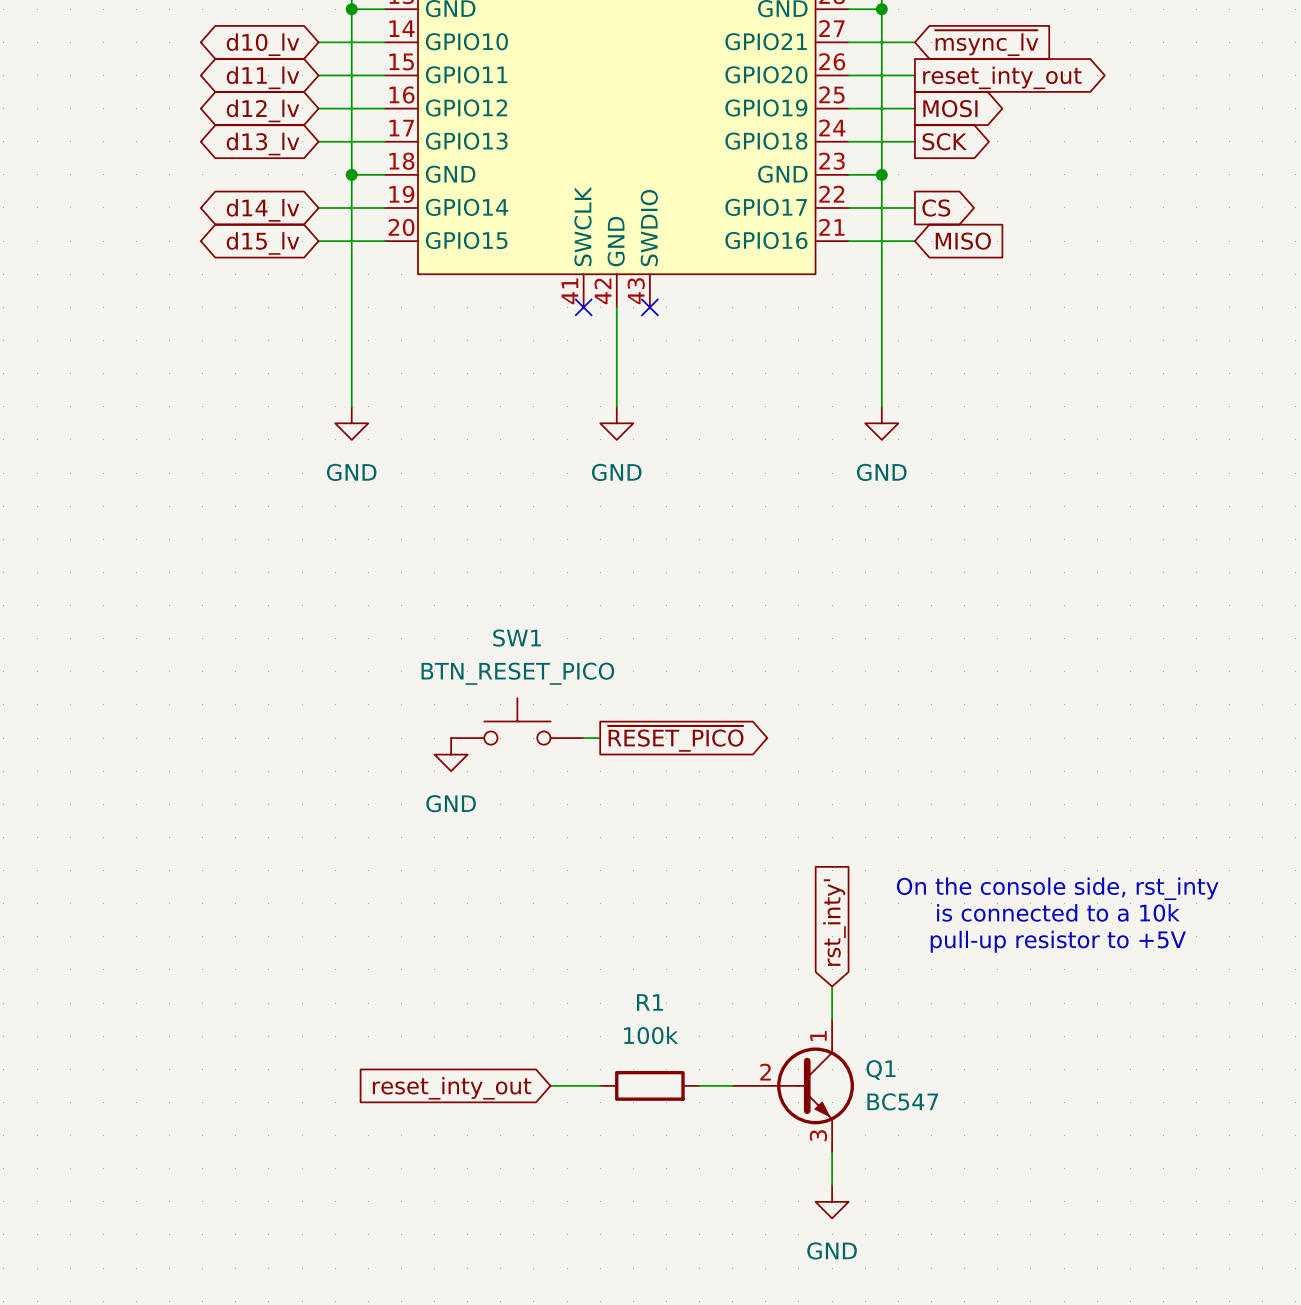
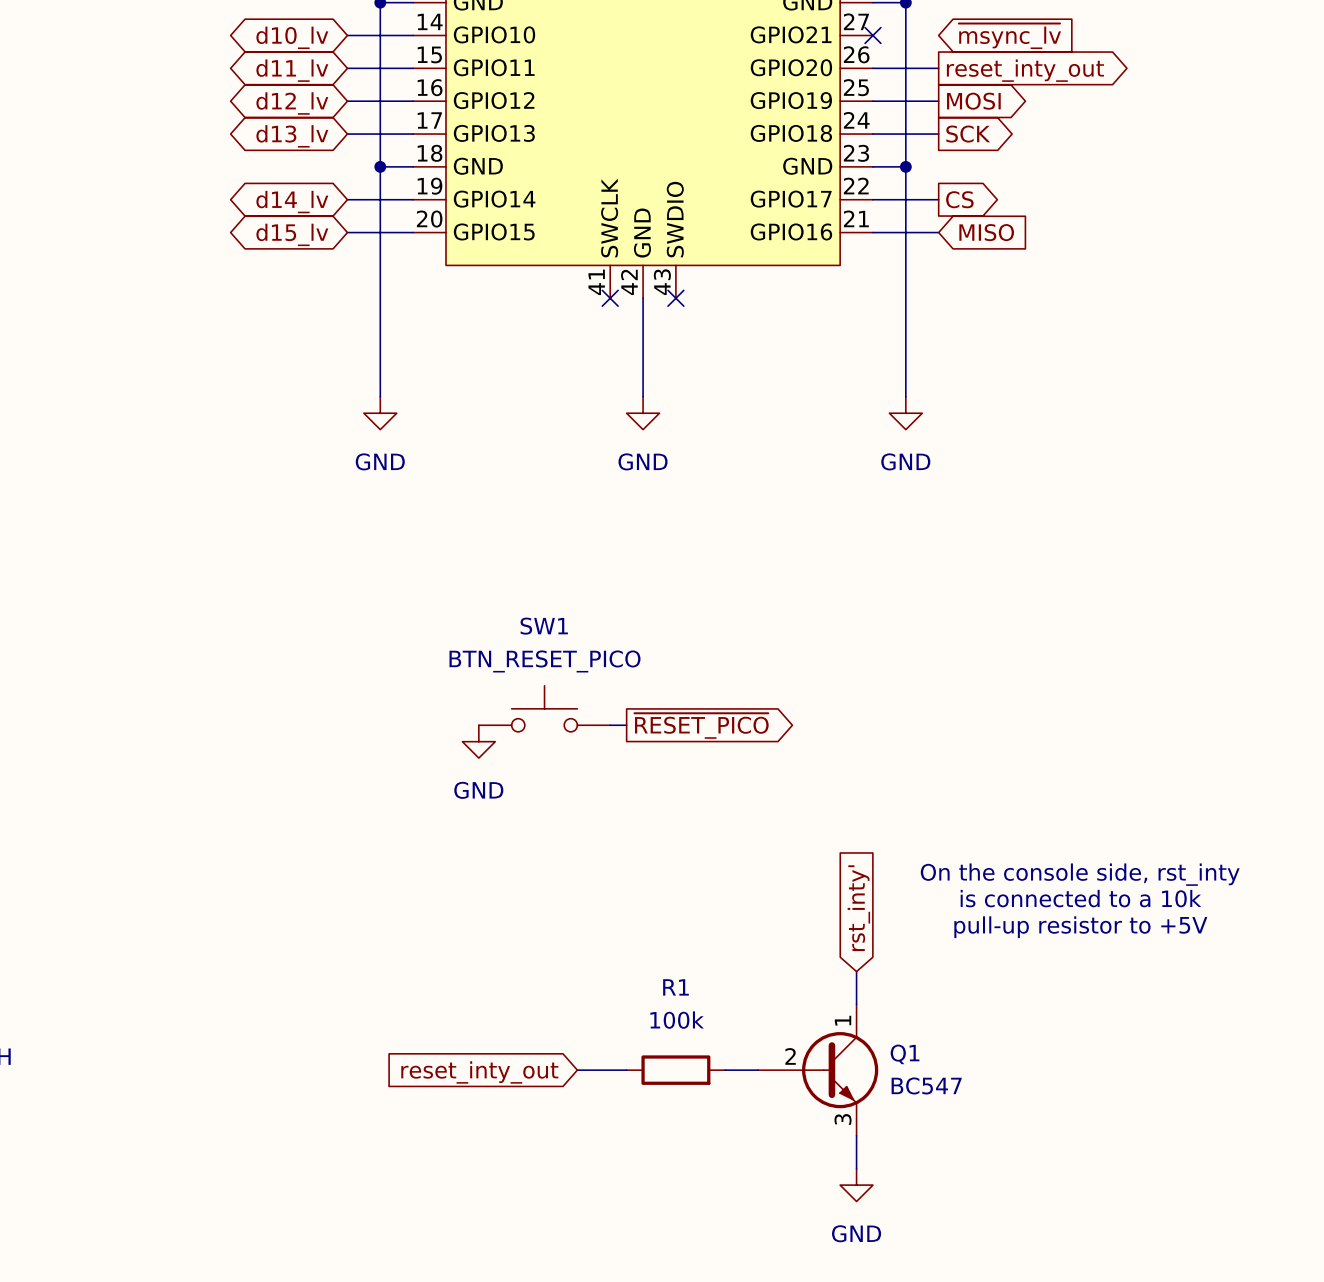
wire: (848, 42) (914, 42) -> none
no-connect mark: none -> (872, 35)

